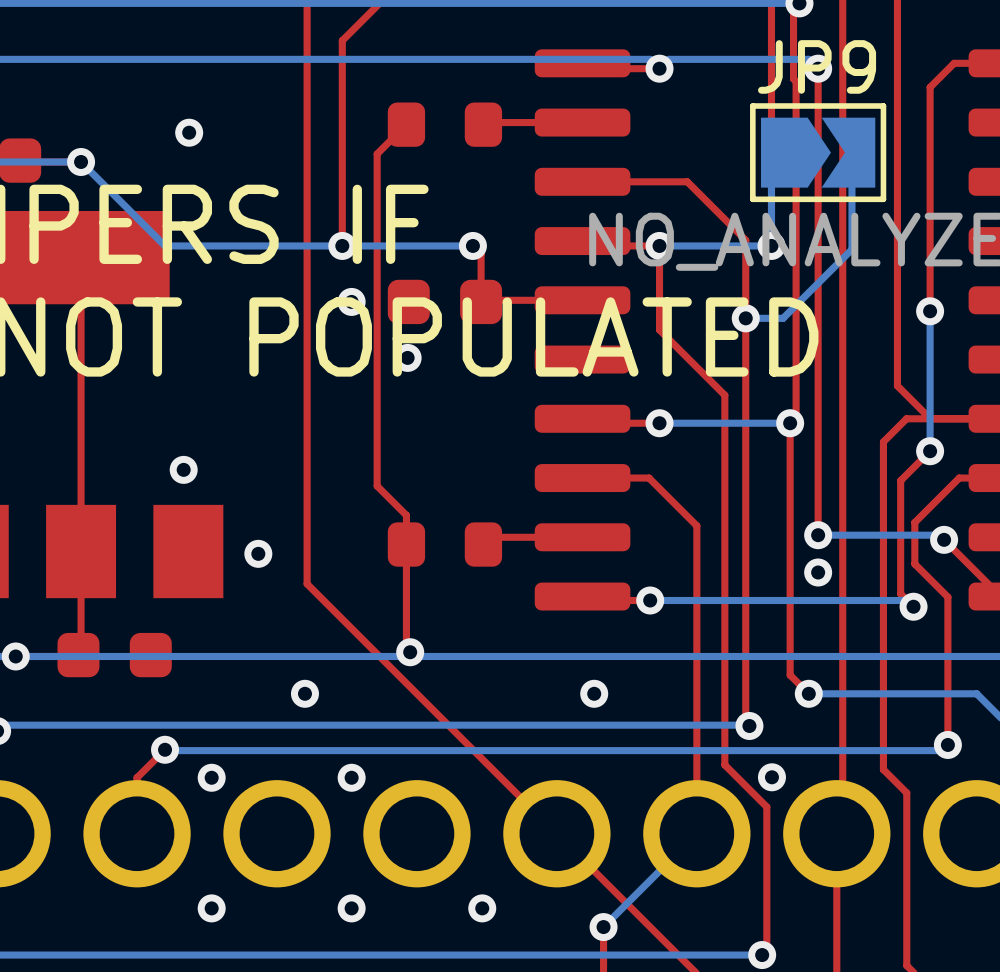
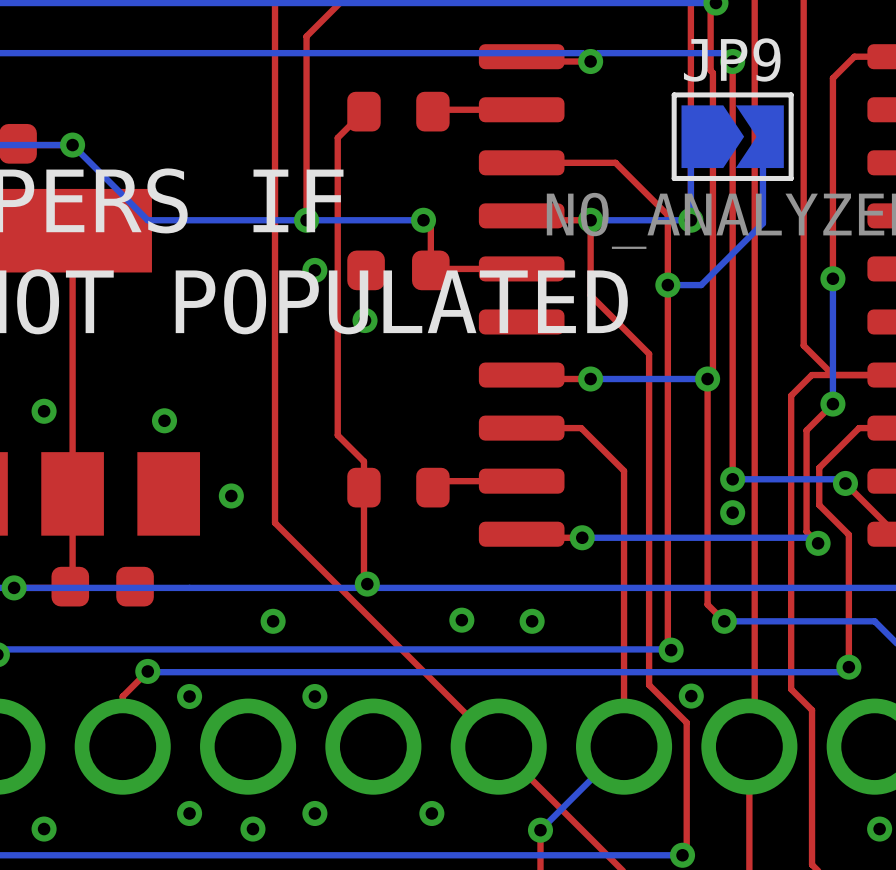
via: (189, 132) -> none
via: none -> (44, 411)
via: none -> (461, 620)
via: none -> (44, 829)
via: none -> (252, 829)
via: none -> (879, 829)

